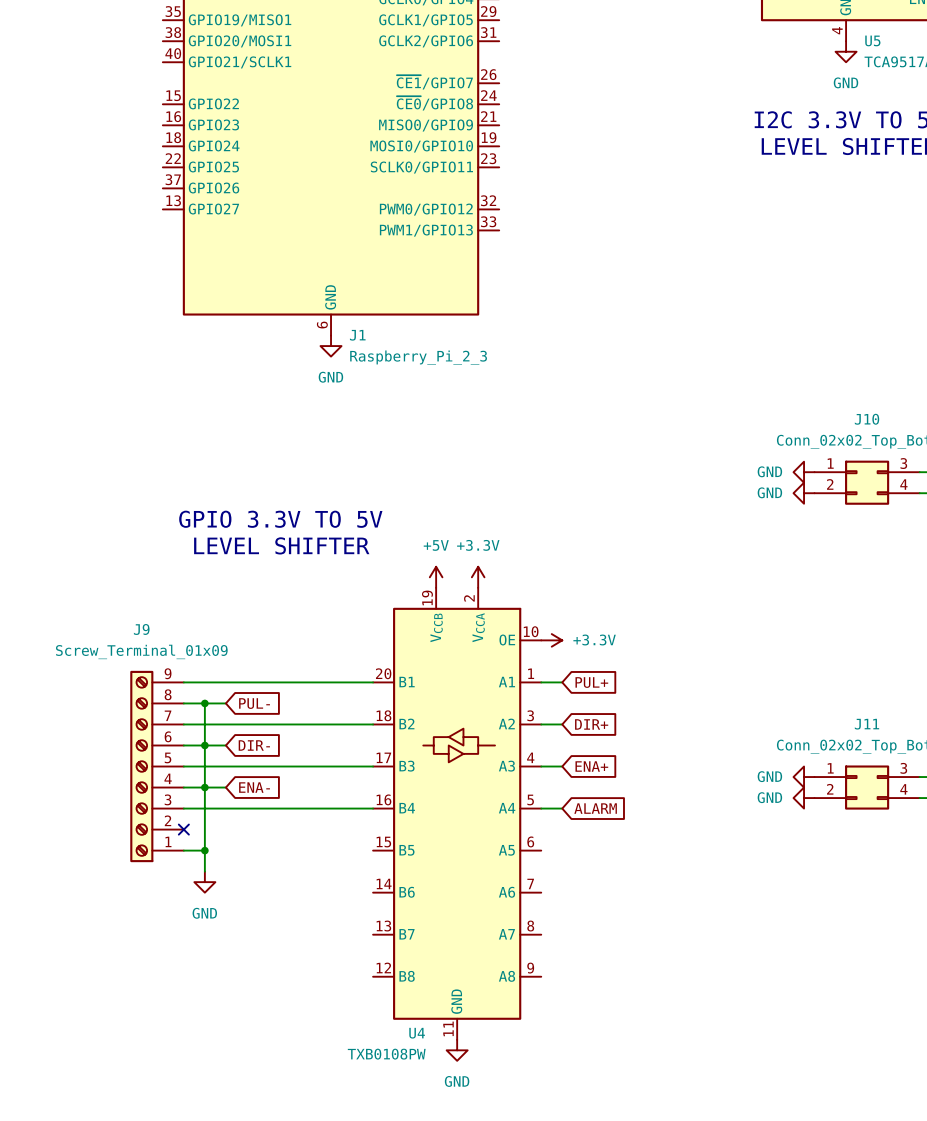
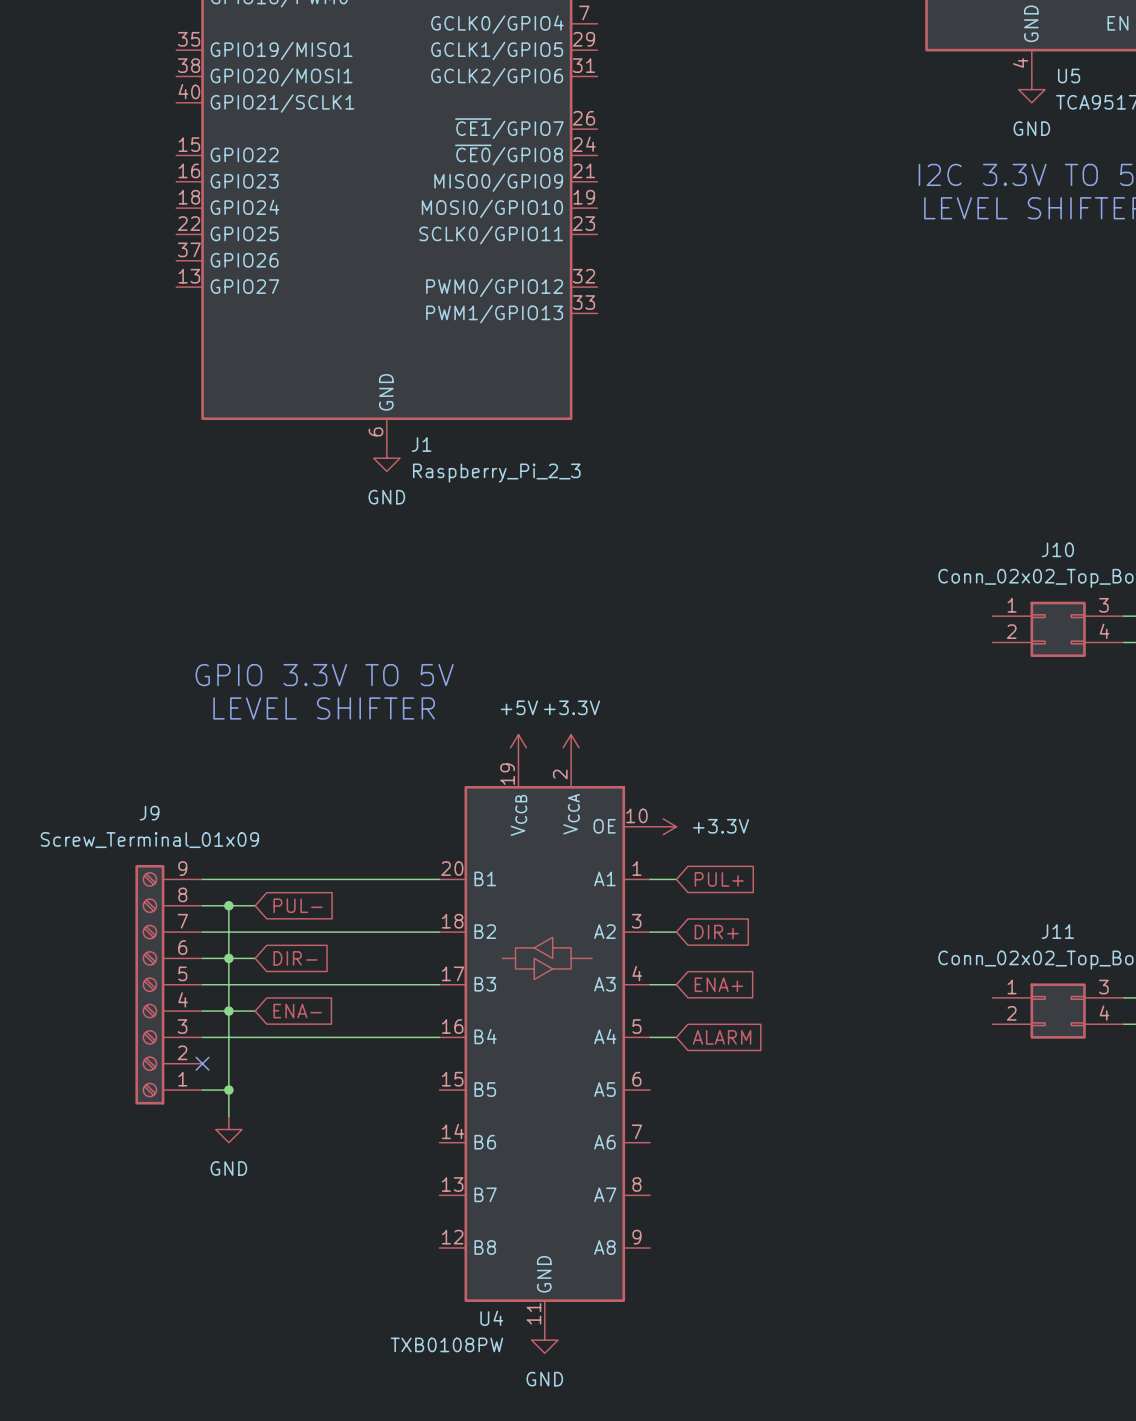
power symbol: GND (804, 472) -> none
power symbol: GND (804, 493) -> none
power symbol: GND (804, 777) -> none
power symbol: GND (804, 798) -> none

